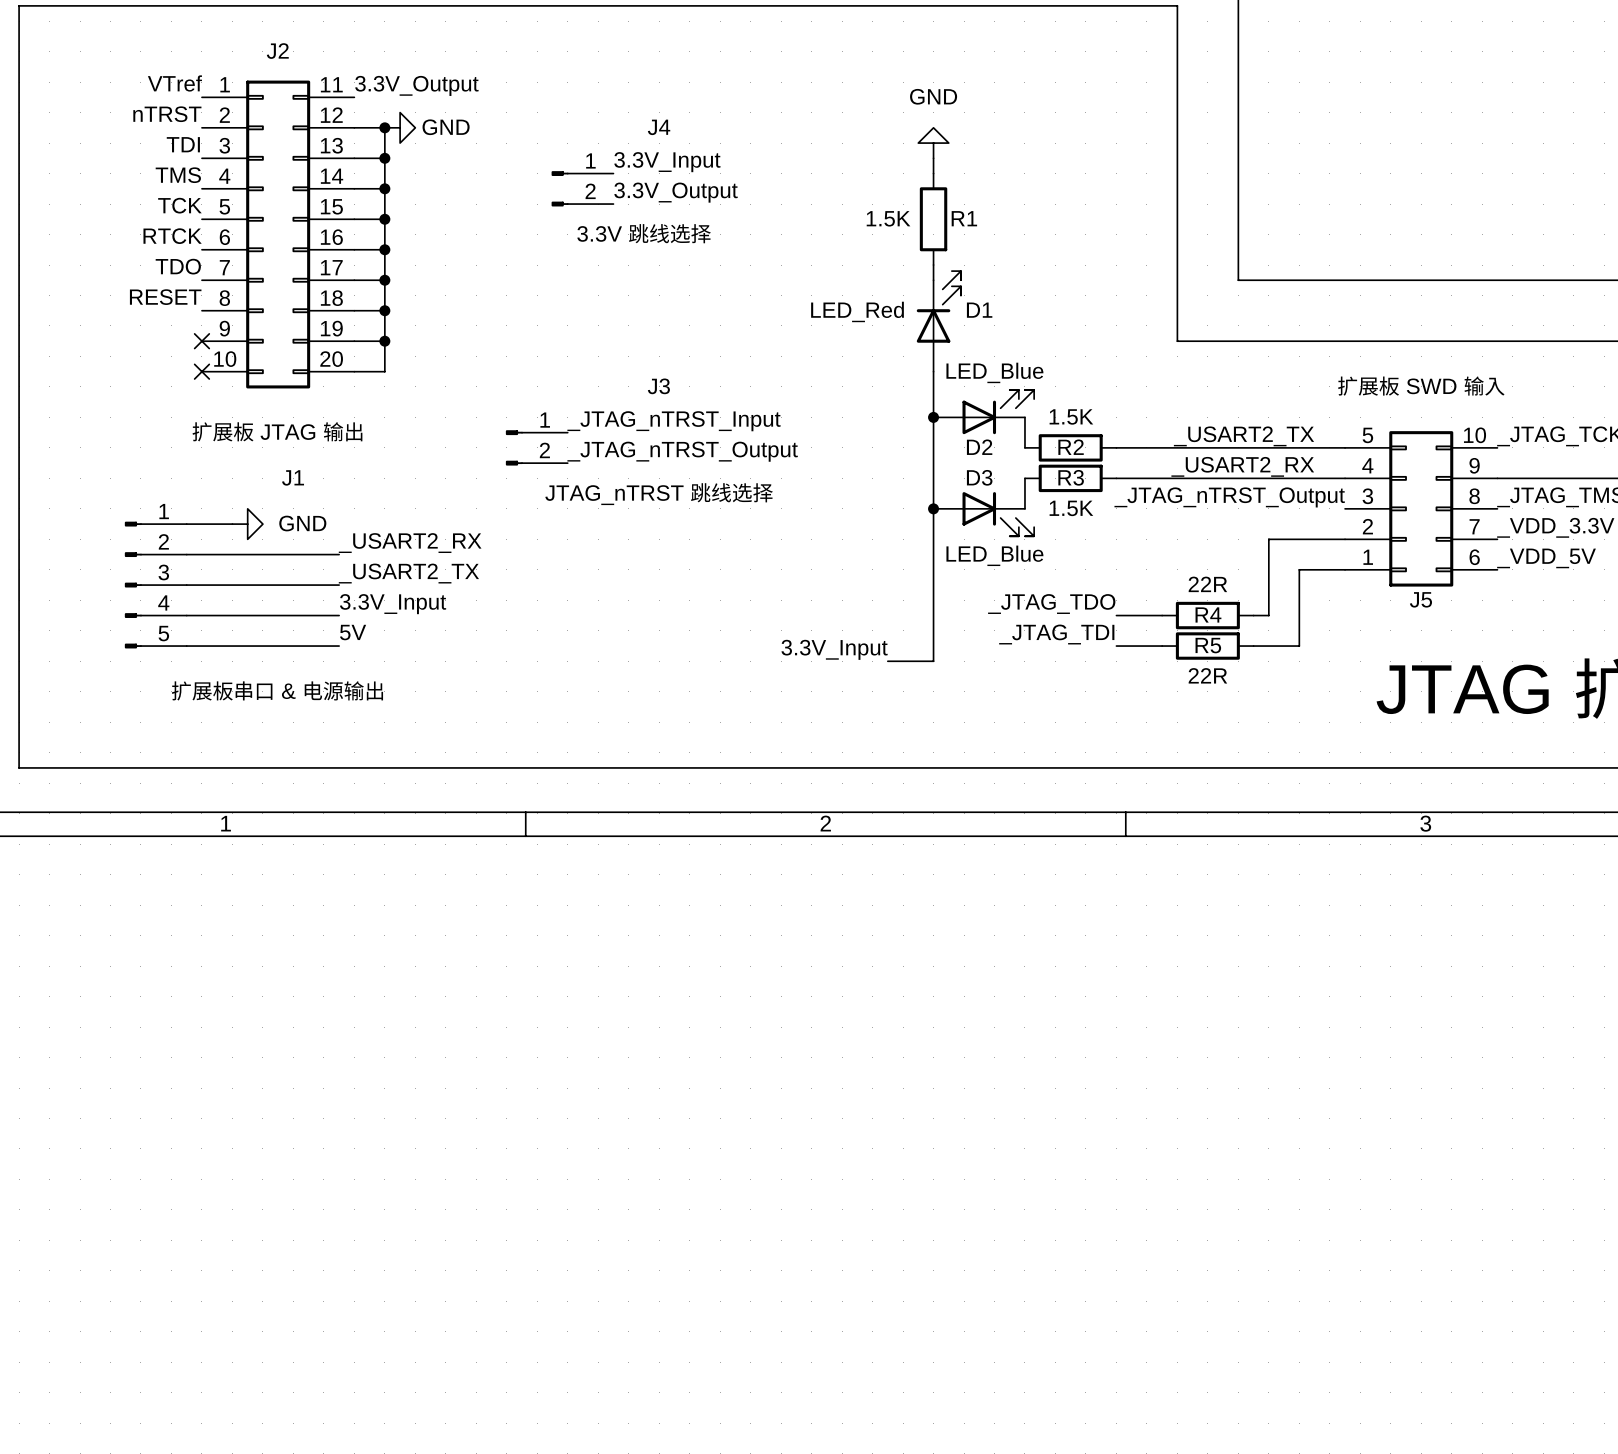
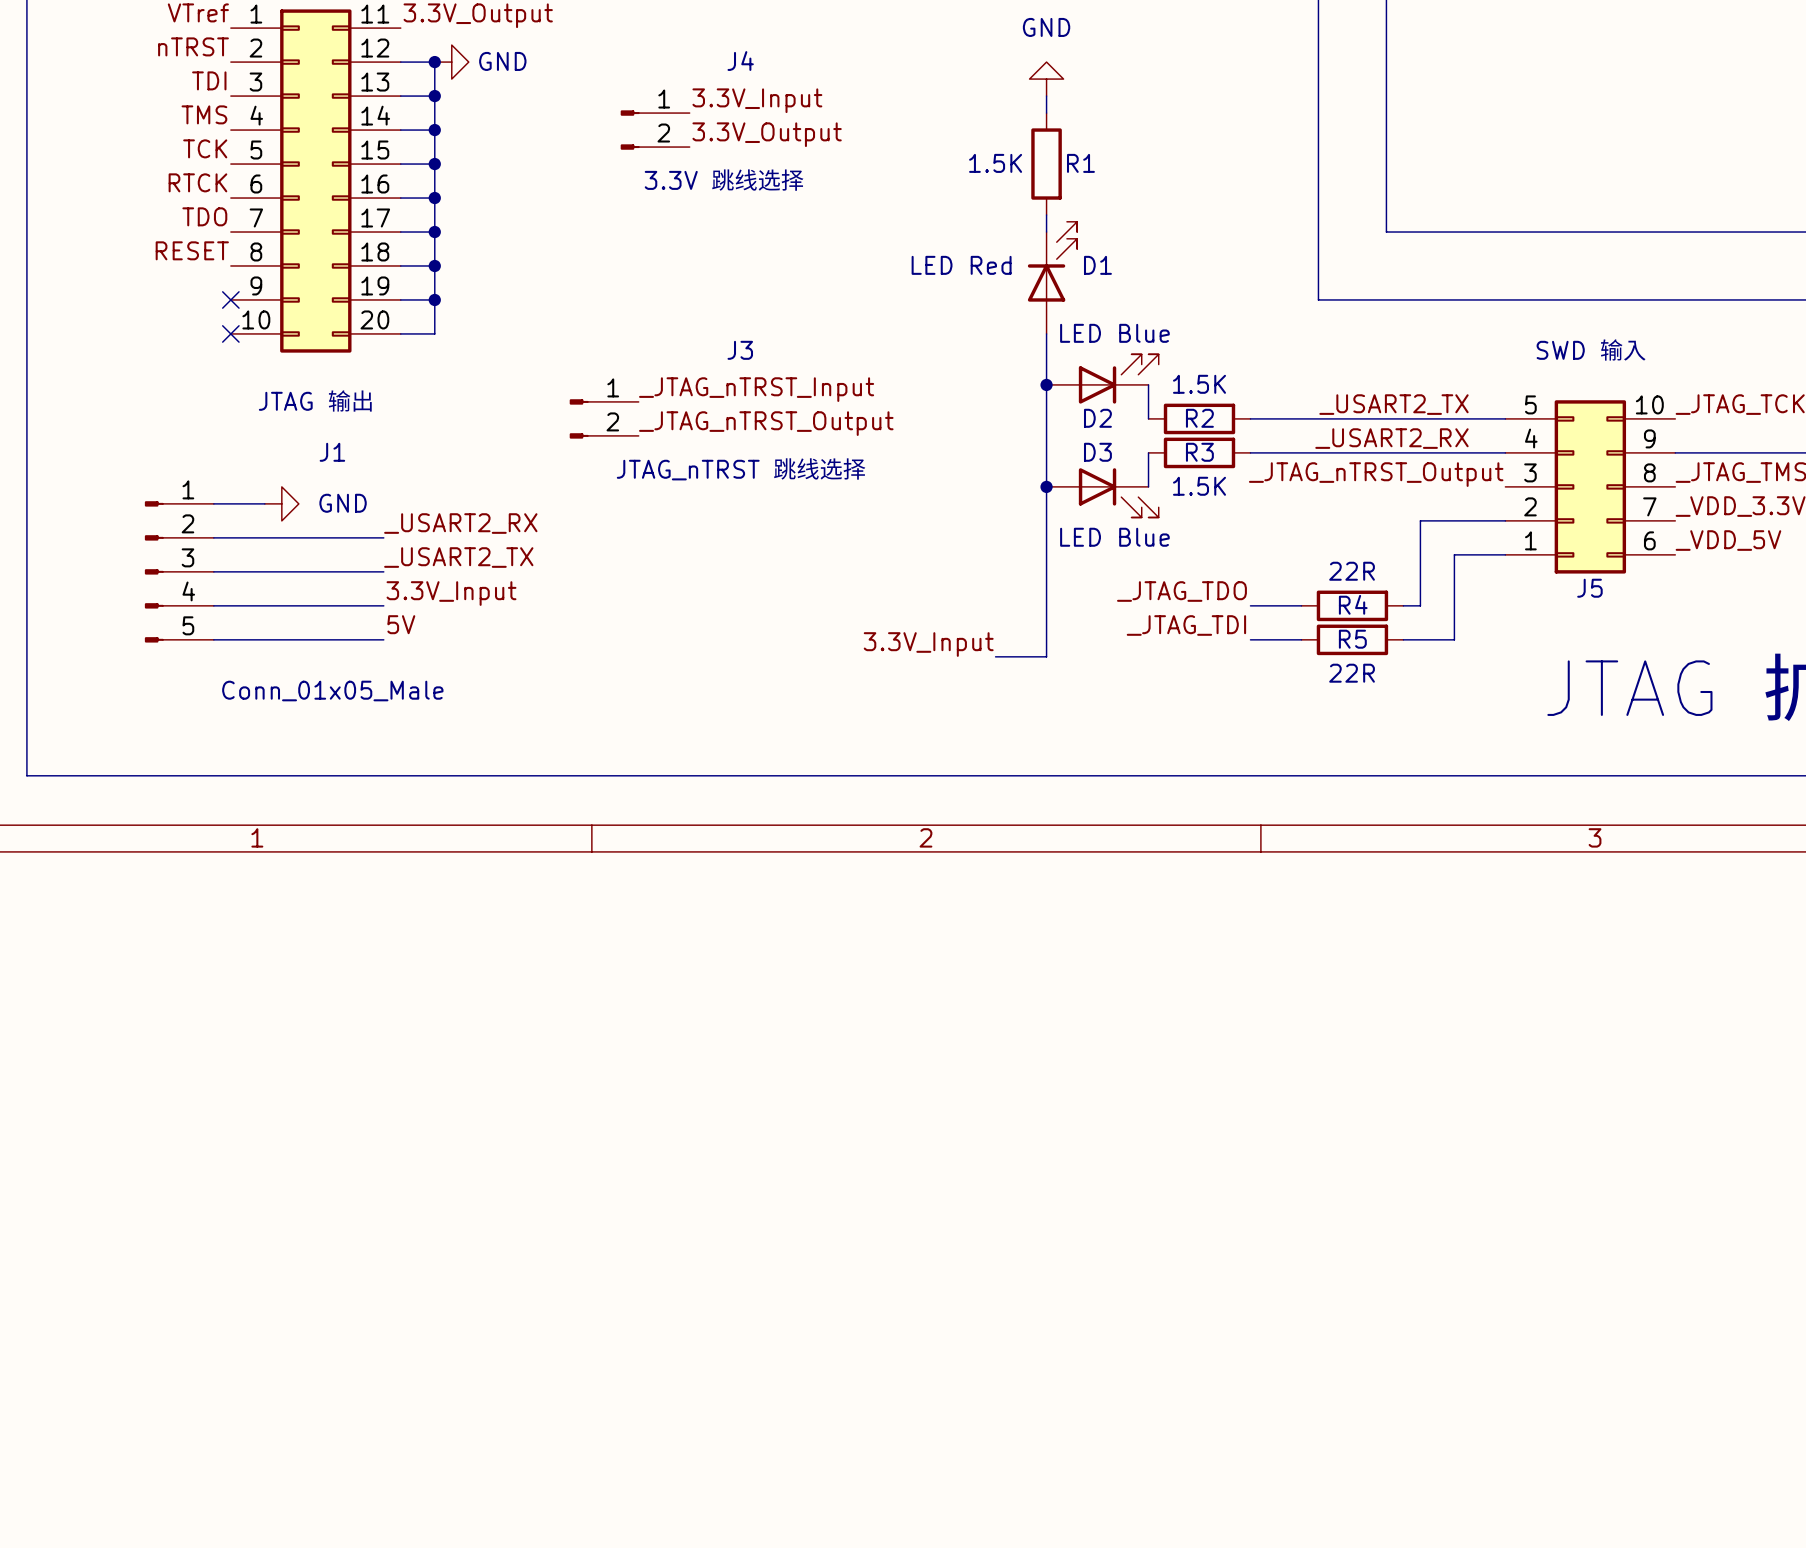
D1 value: LED_Red (857, 311) -> LED Red (961, 265)
D2 value: LED_Blue (994, 372) -> LED Blue (1114, 333)
J5 value: 扩展板 SWD 输入 (1421, 386) -> SWD 输入 (1591, 349)
J2 value: 扩展板 JTAG 输出 (277, 431) -> JTAG 输出 (315, 400)
D3 value: LED_Blue (994, 555) -> LED Blue (1114, 537)
J1 value: 扩展板串口 & 电源输出 (277, 690) -> Conn_01x05_Male (332, 691)

